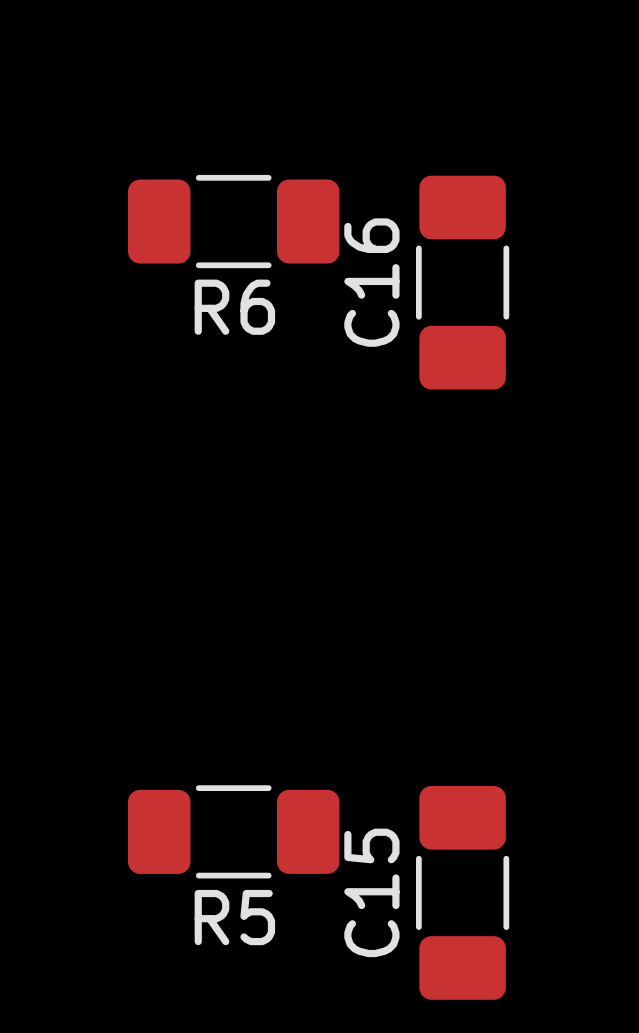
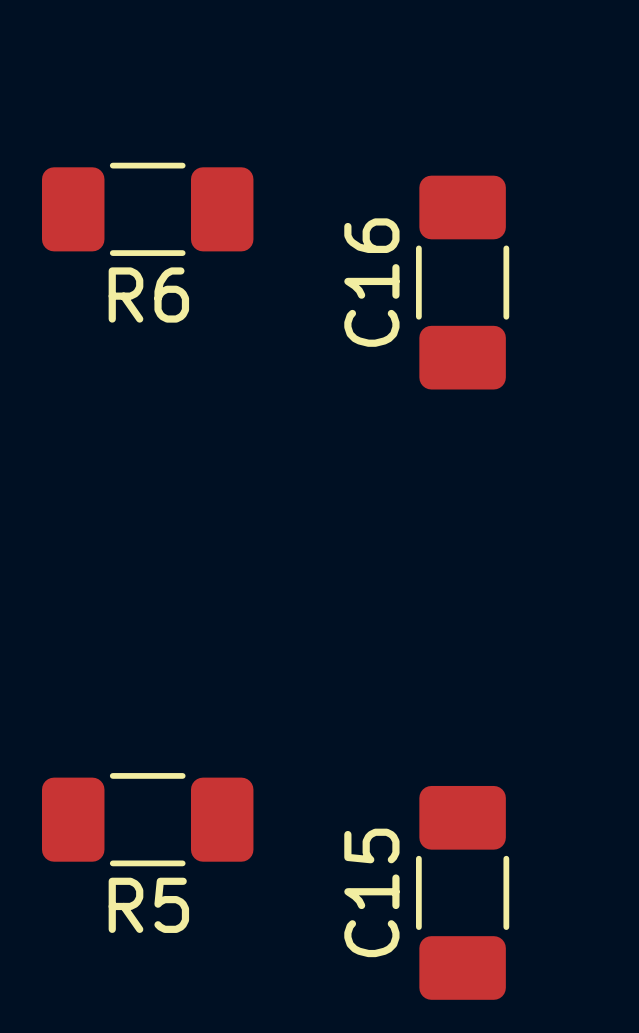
R6 position: (233, 221) -> (147, 209)
R5 position: (233, 831) -> (147, 819)

